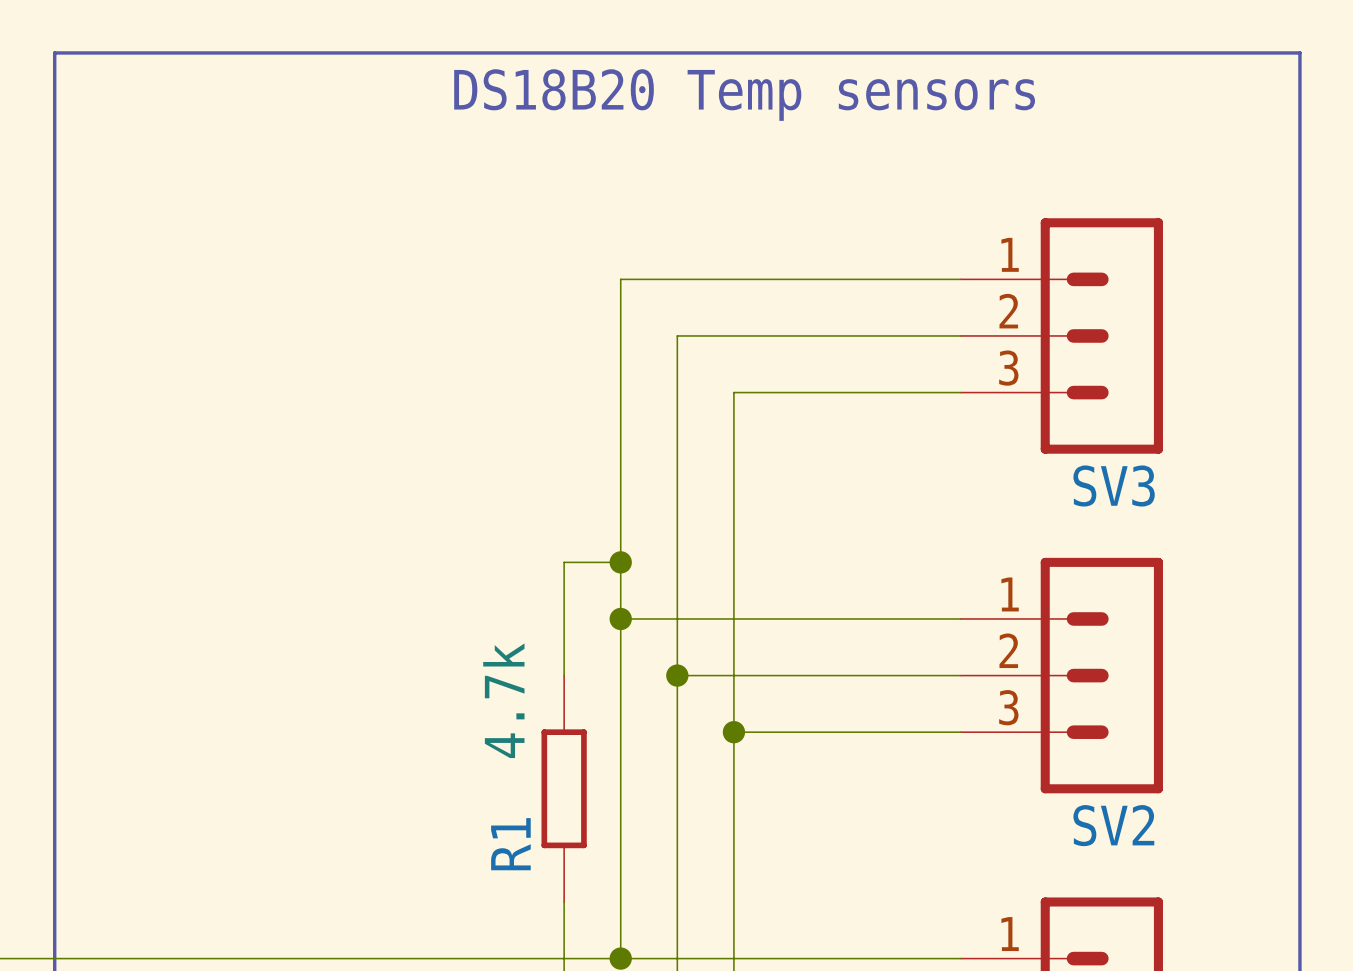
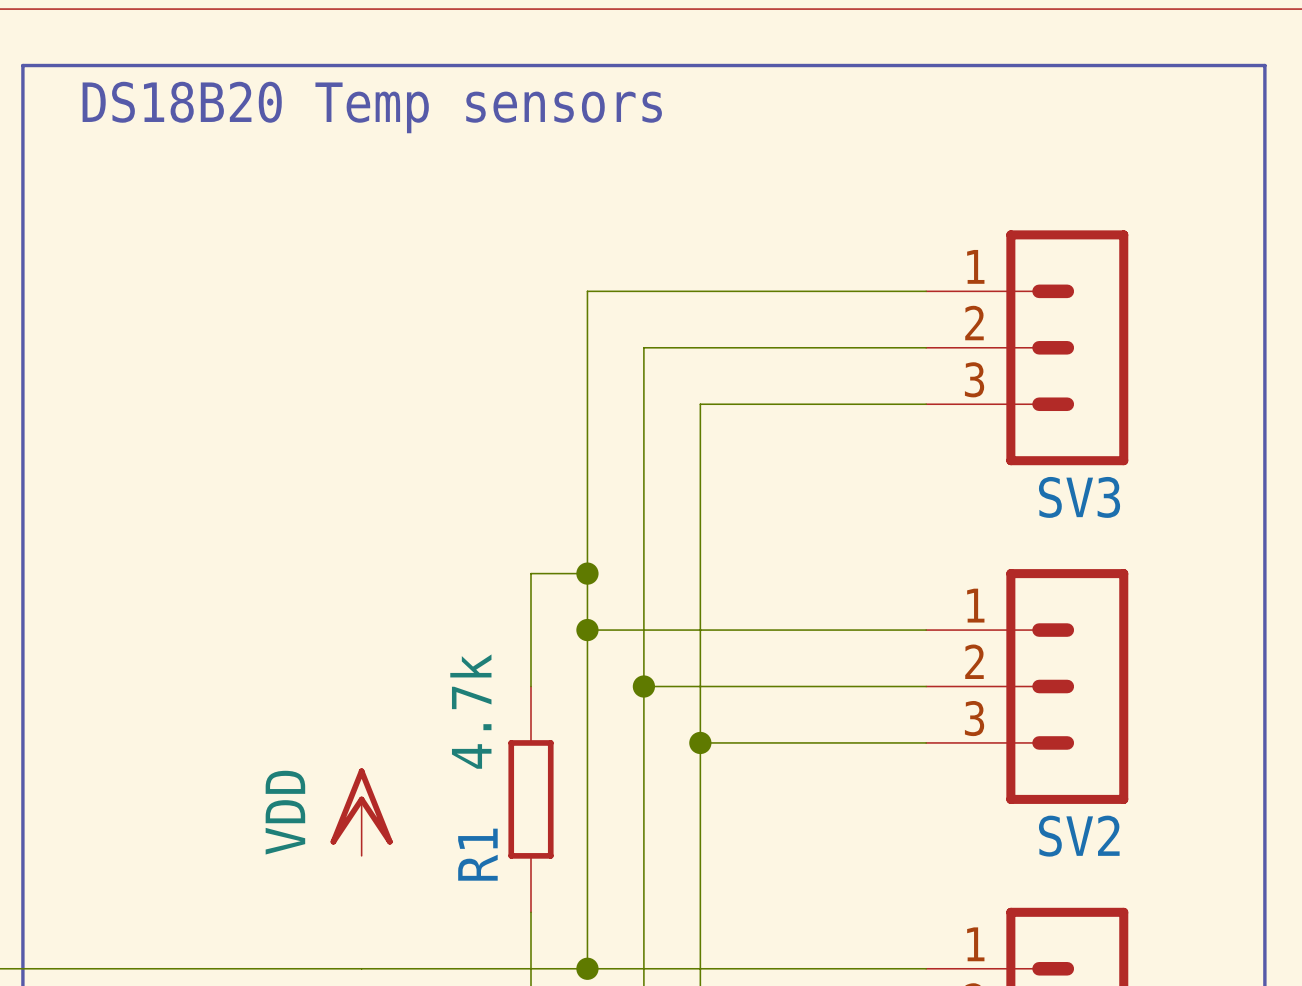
text position: DS18B20 Temp sensors (744, 95) -> DS18B20 Temp sensors (372, 107)
power symbol: none -> VDD (361, 812)

